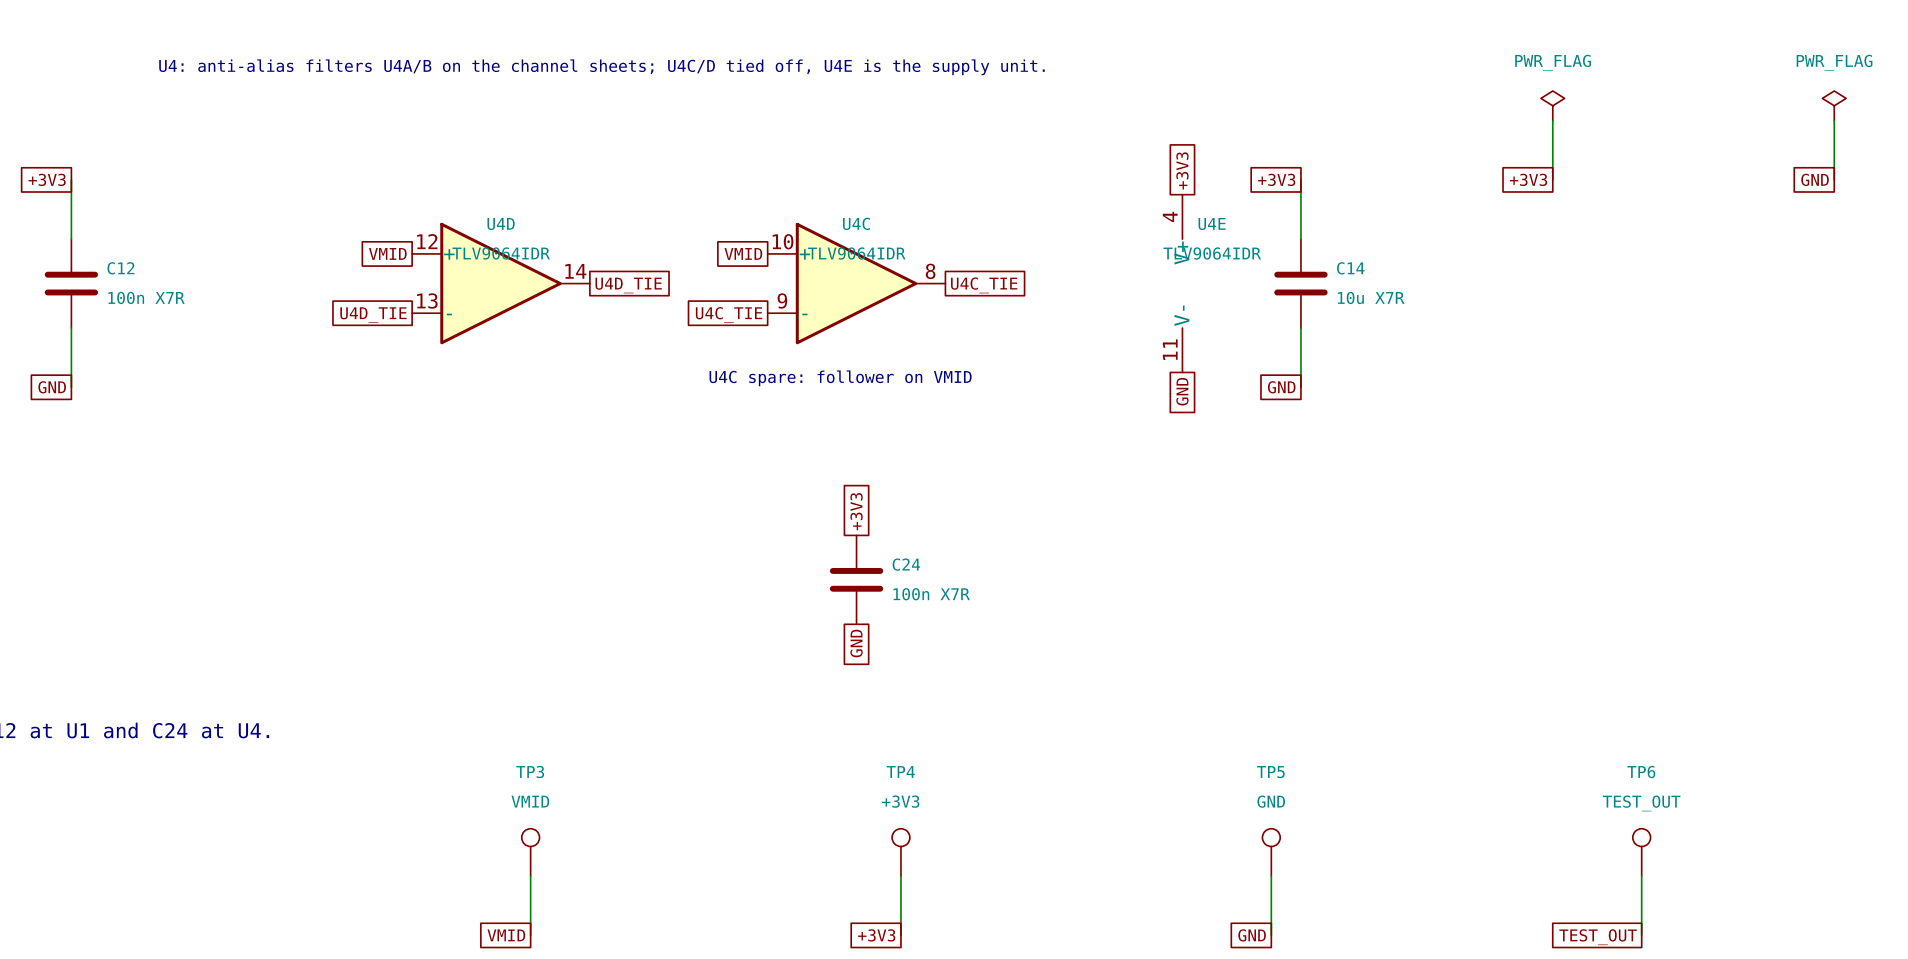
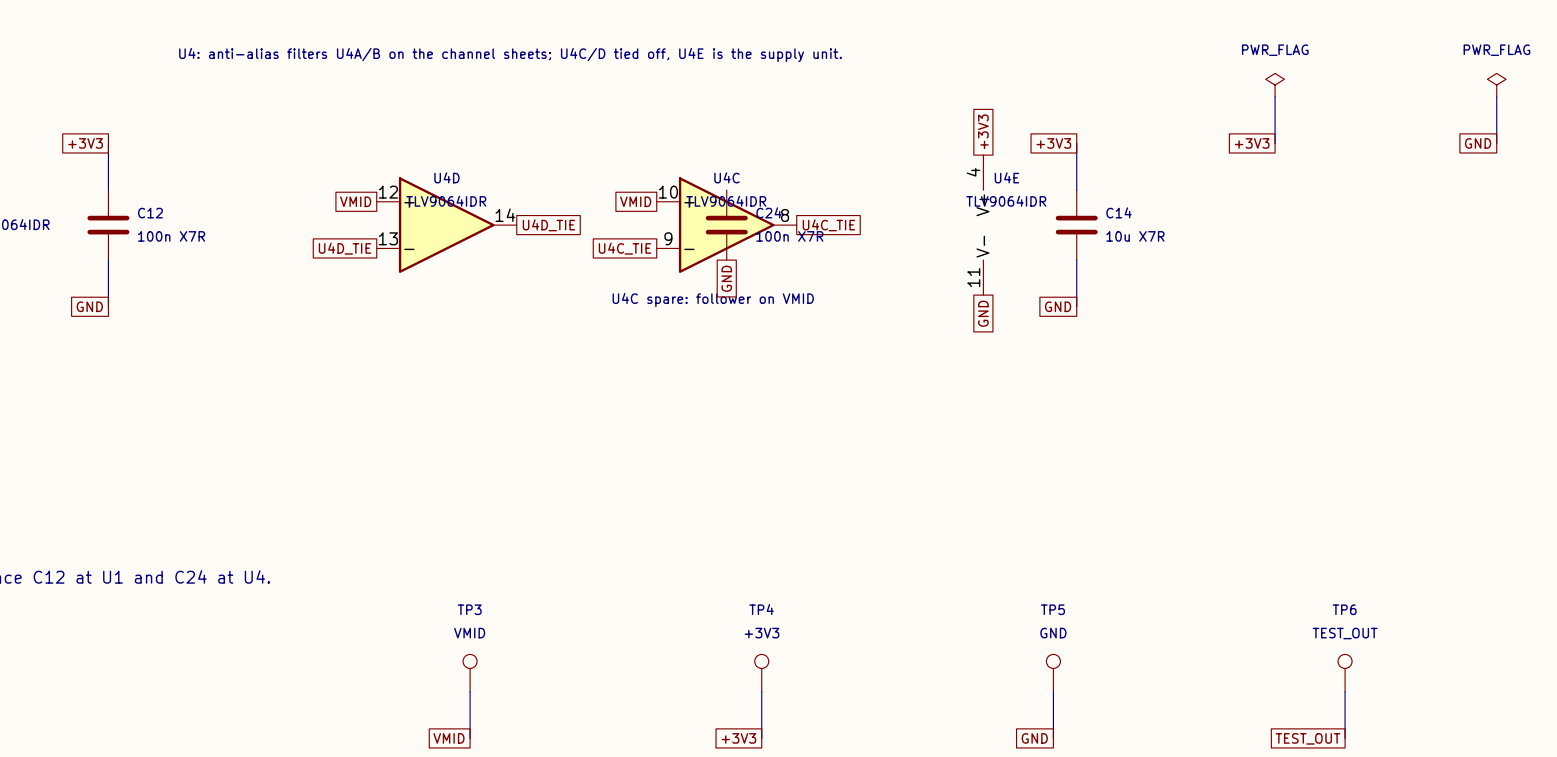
global label: none -> GND (726, 278)
global label: +3V3 (856, 511) -> none
C24 position: (856, 579) -> (726, 225)
global label: GND (856, 643) -> none

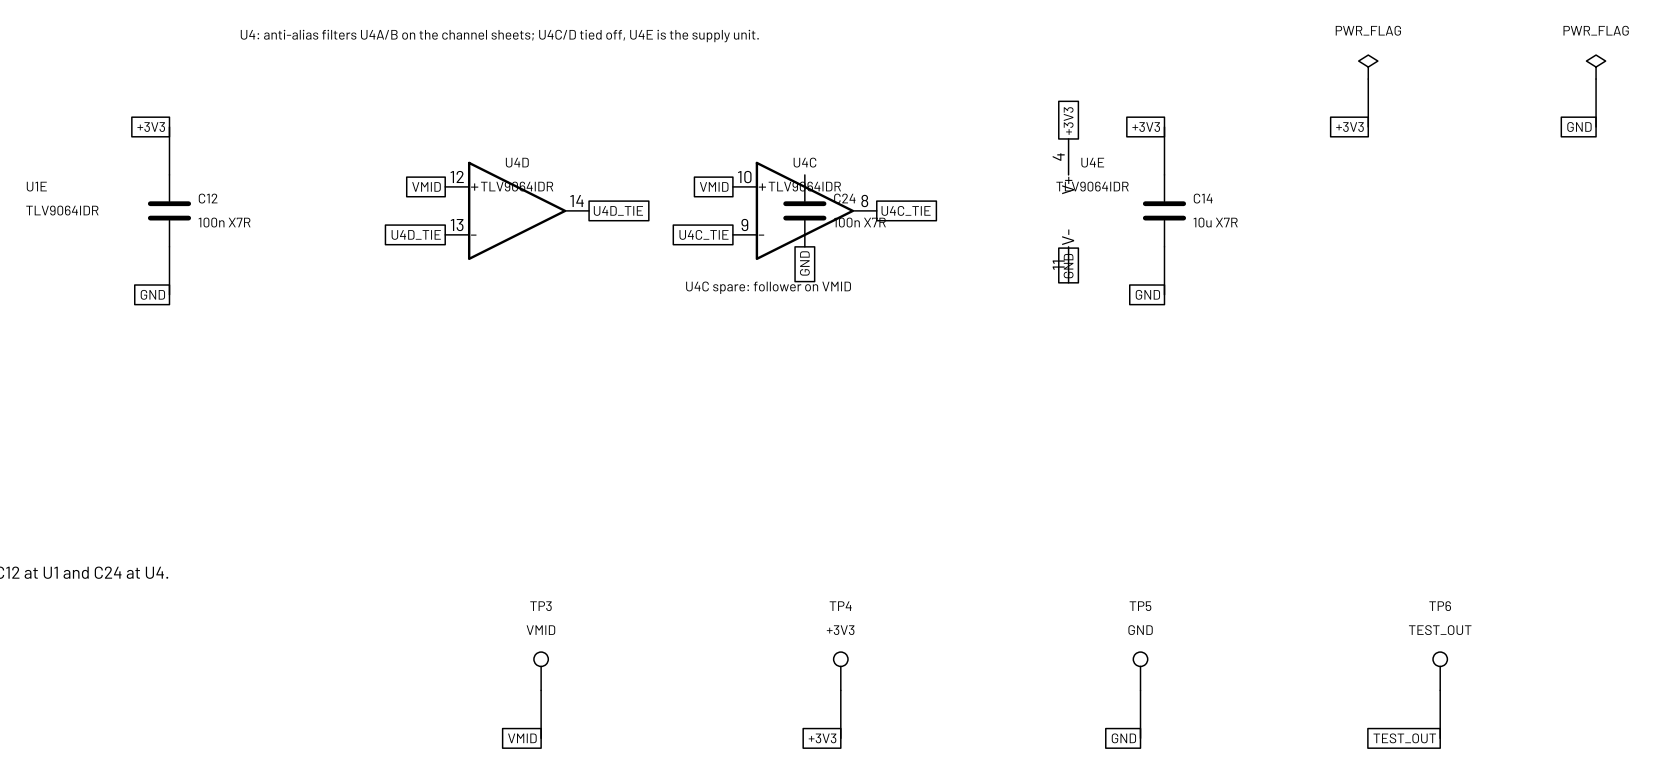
global label rotation: 0° (983, 313) -> 180° (1068, 266)

